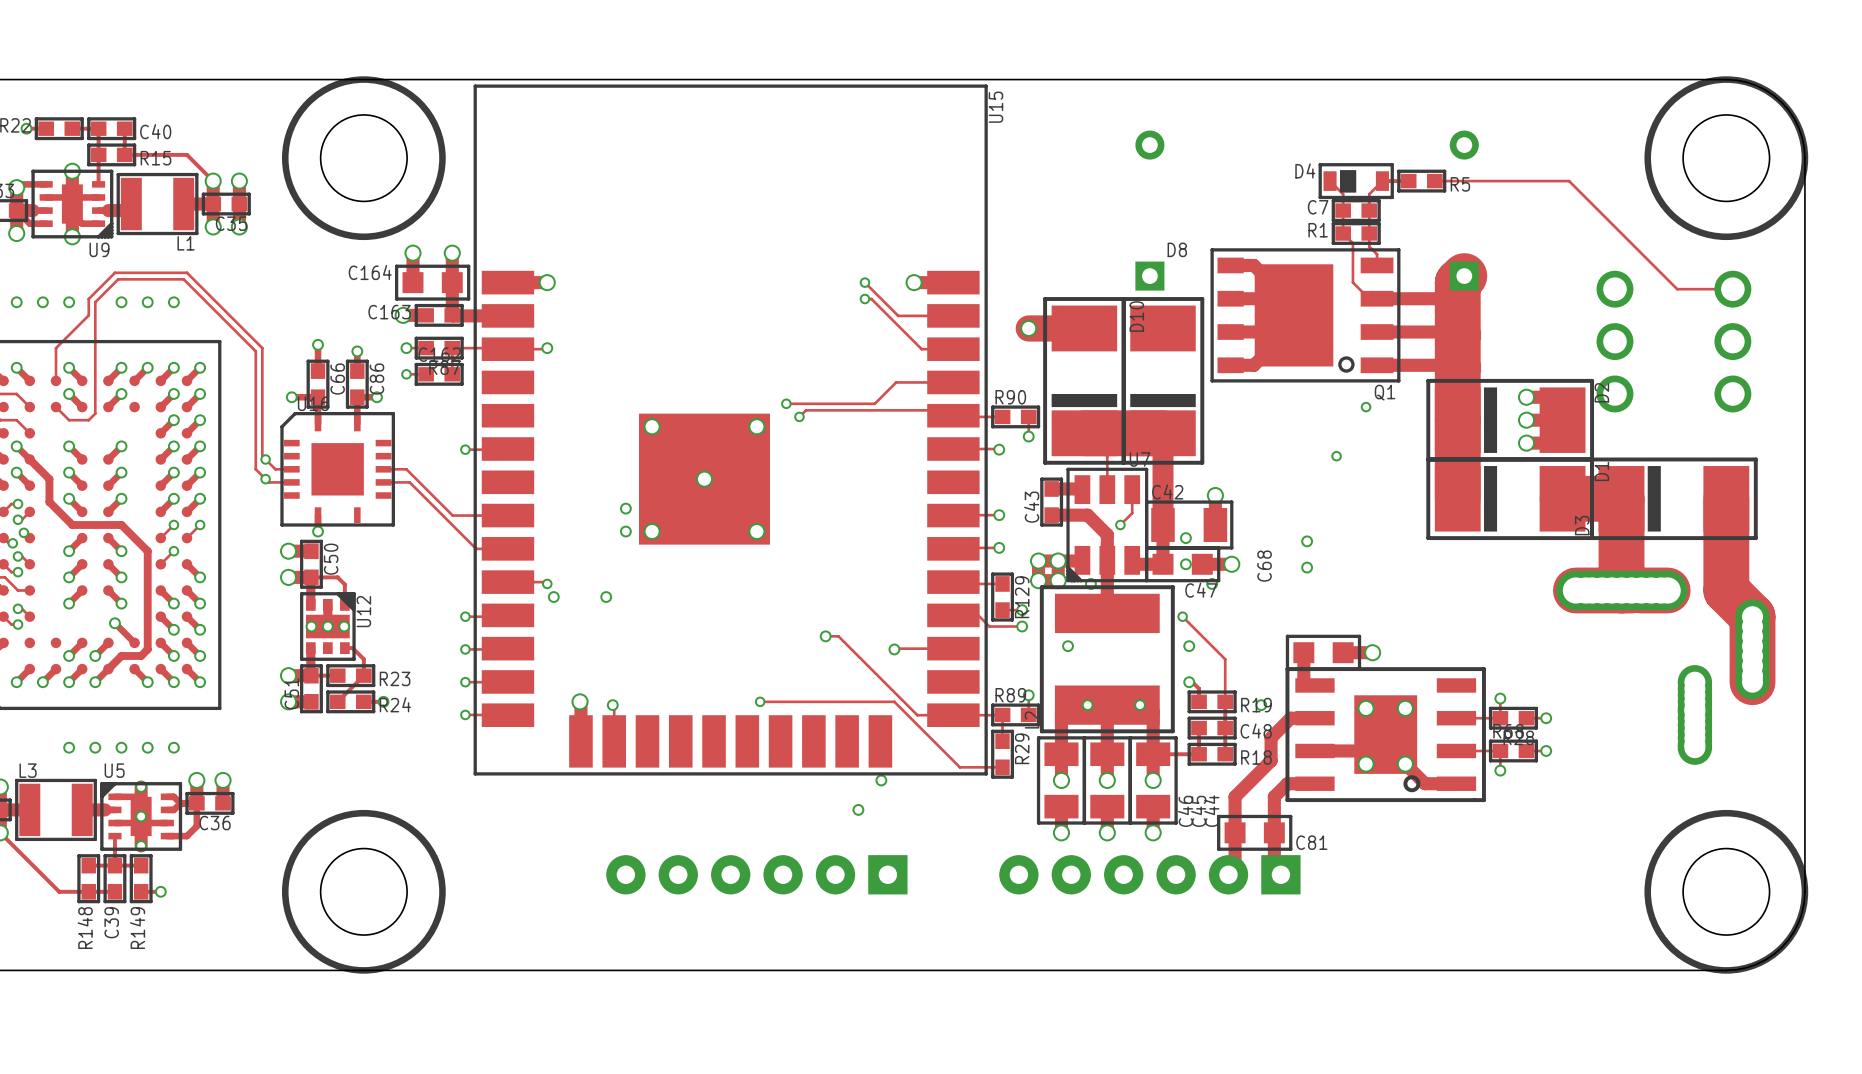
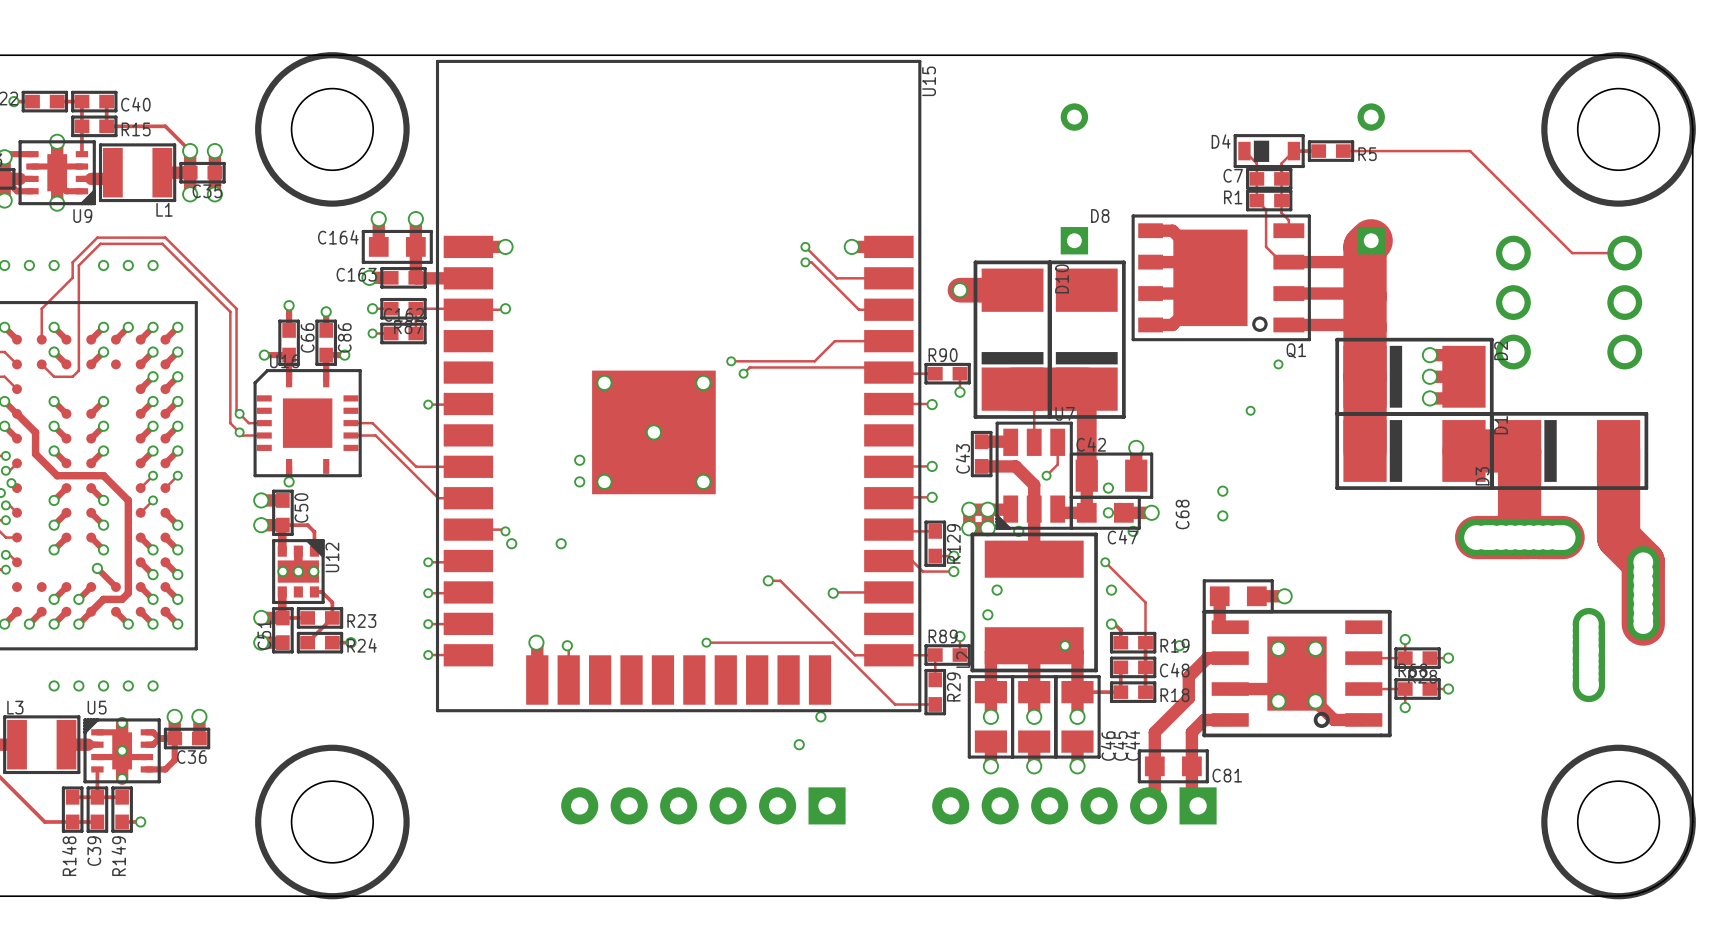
via position: (1087, 705) -> (987, 614)

